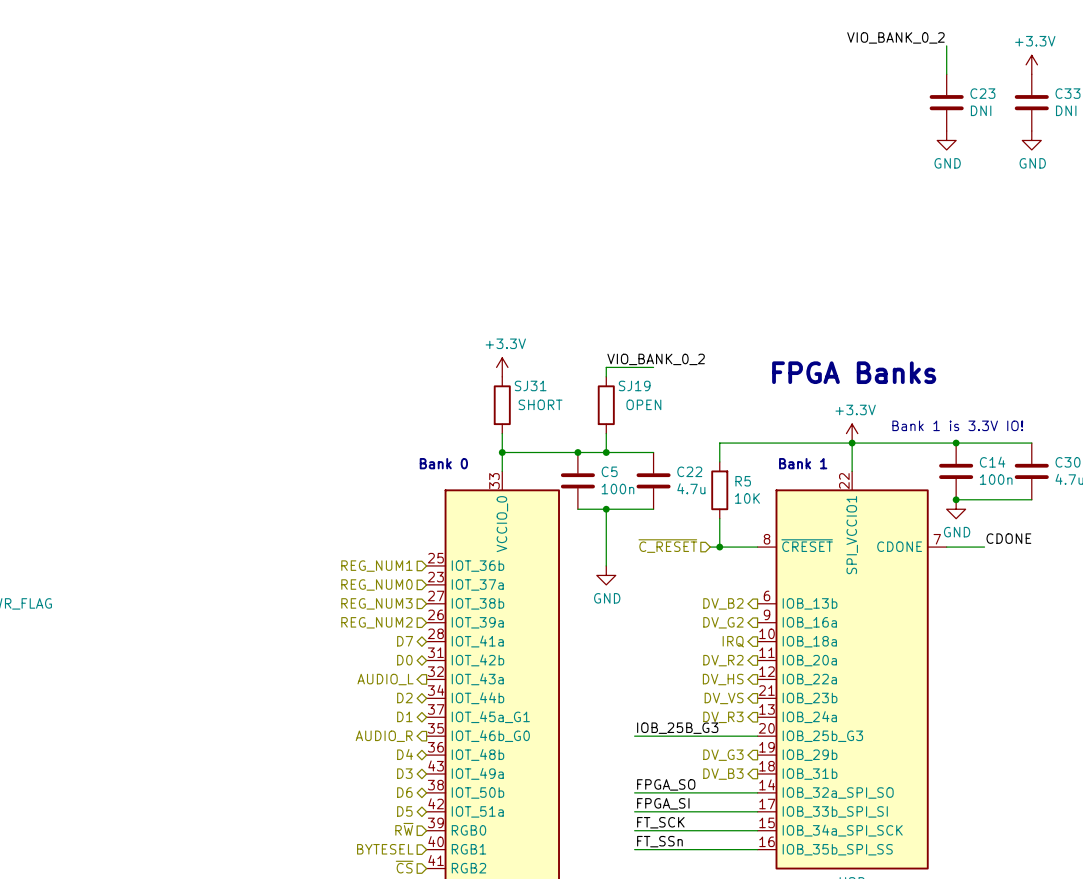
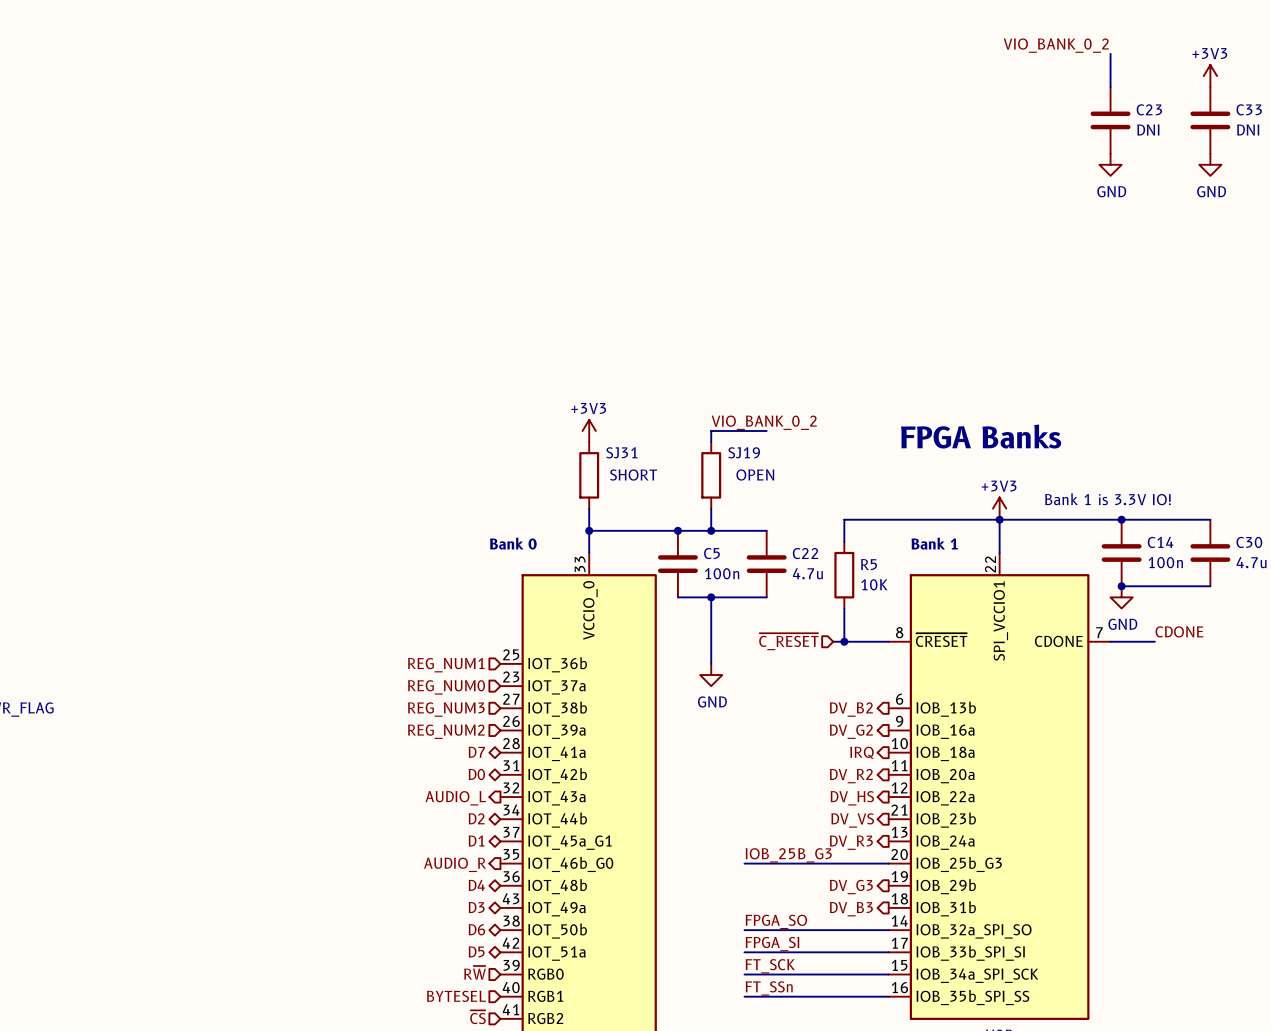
power symbol: +3.3V (1031, 64) -> +3V3 (1210, 76)
power symbol: +3.3V (502, 367) -> +3V3 (589, 430)
power symbol: +3.3V (852, 433) -> +3V3 (999, 508)

